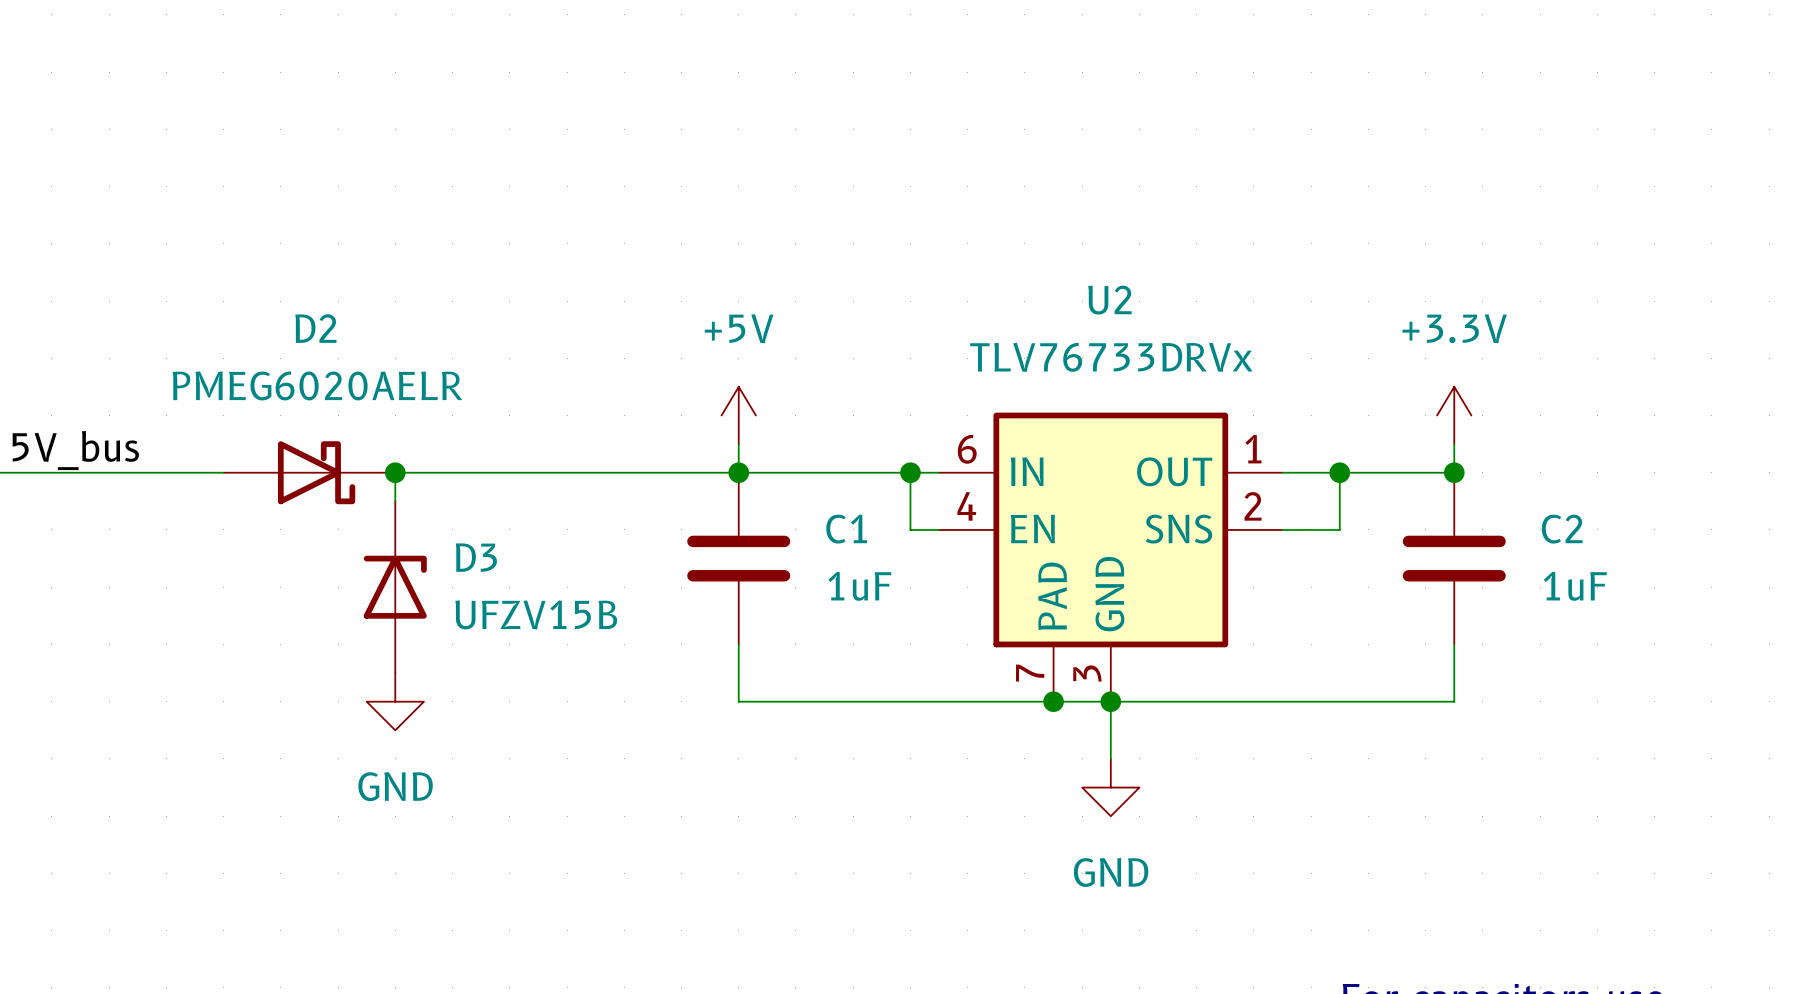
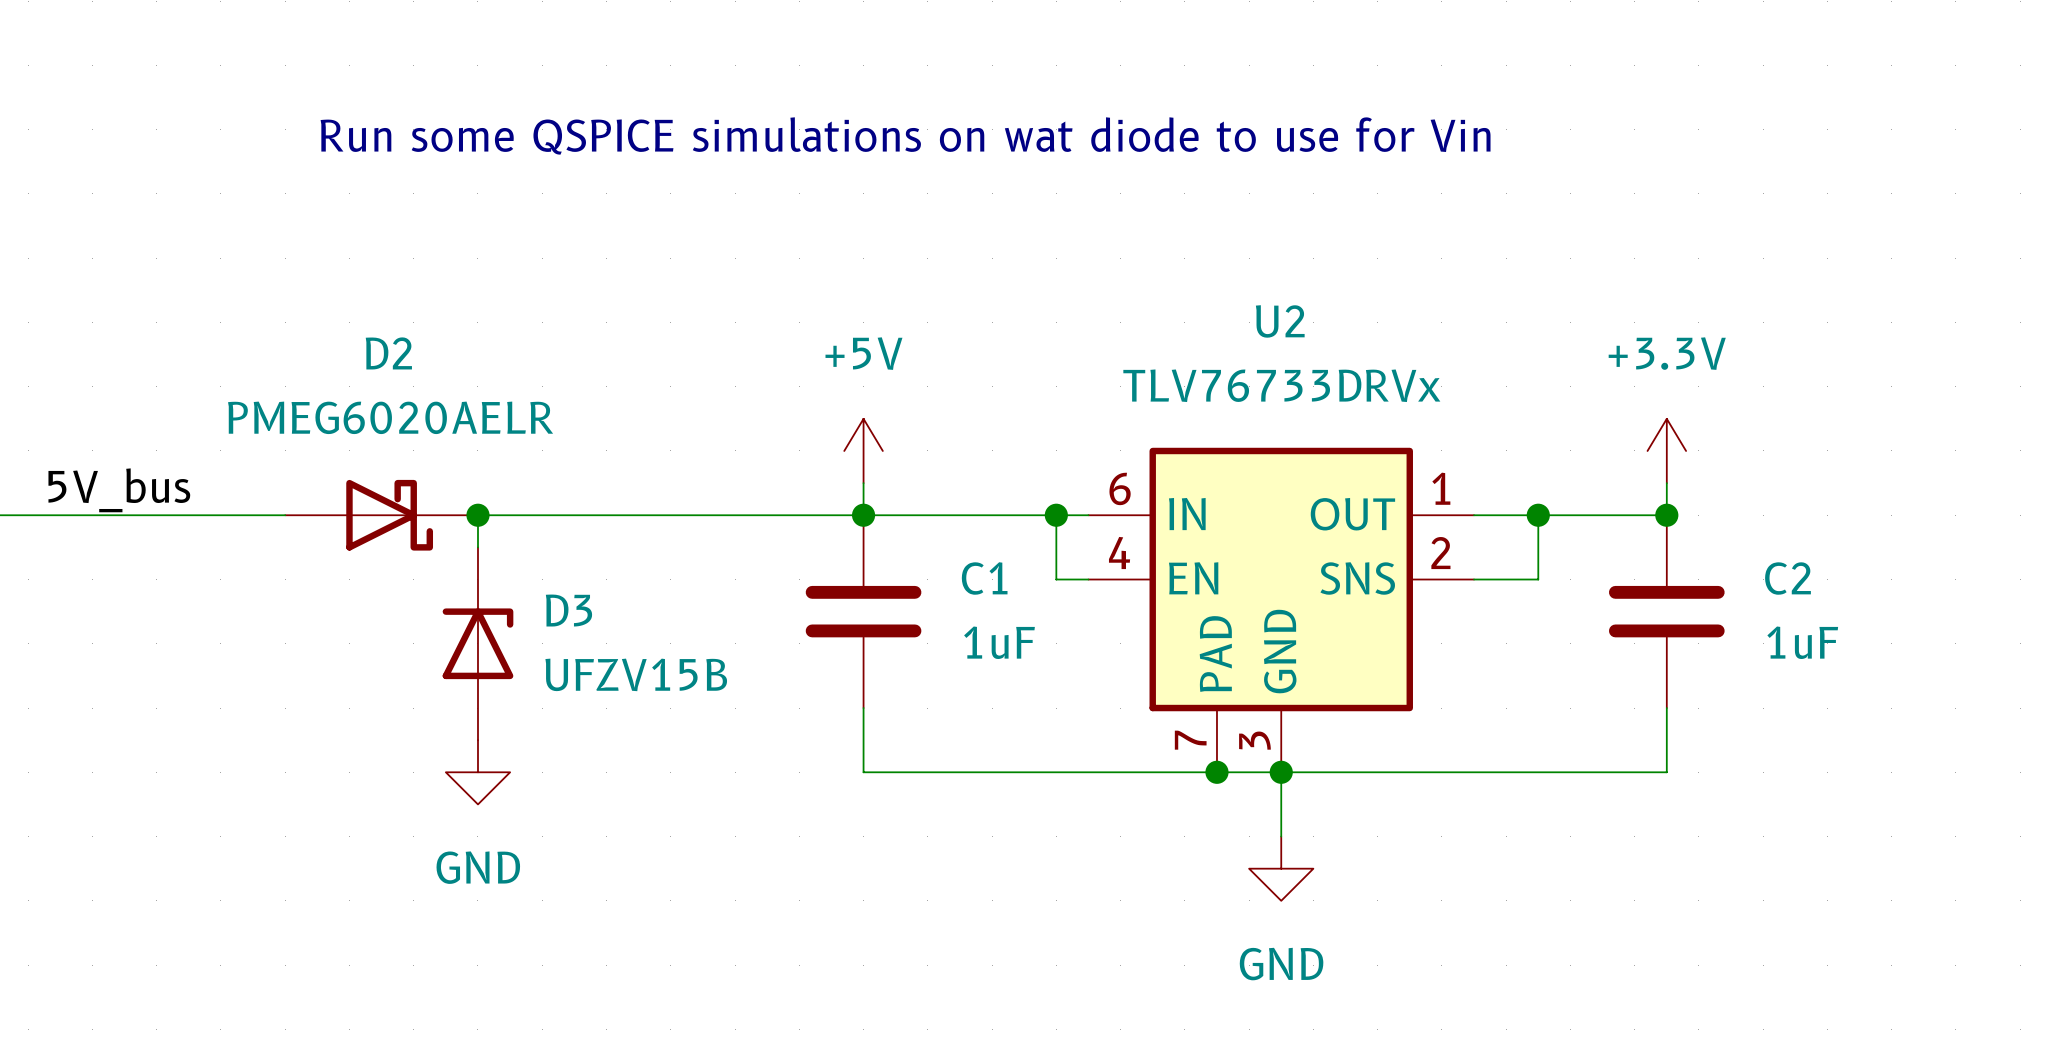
text: none -> Run some QSPICE simulations on wat diode to use for Vin (905, 135)

